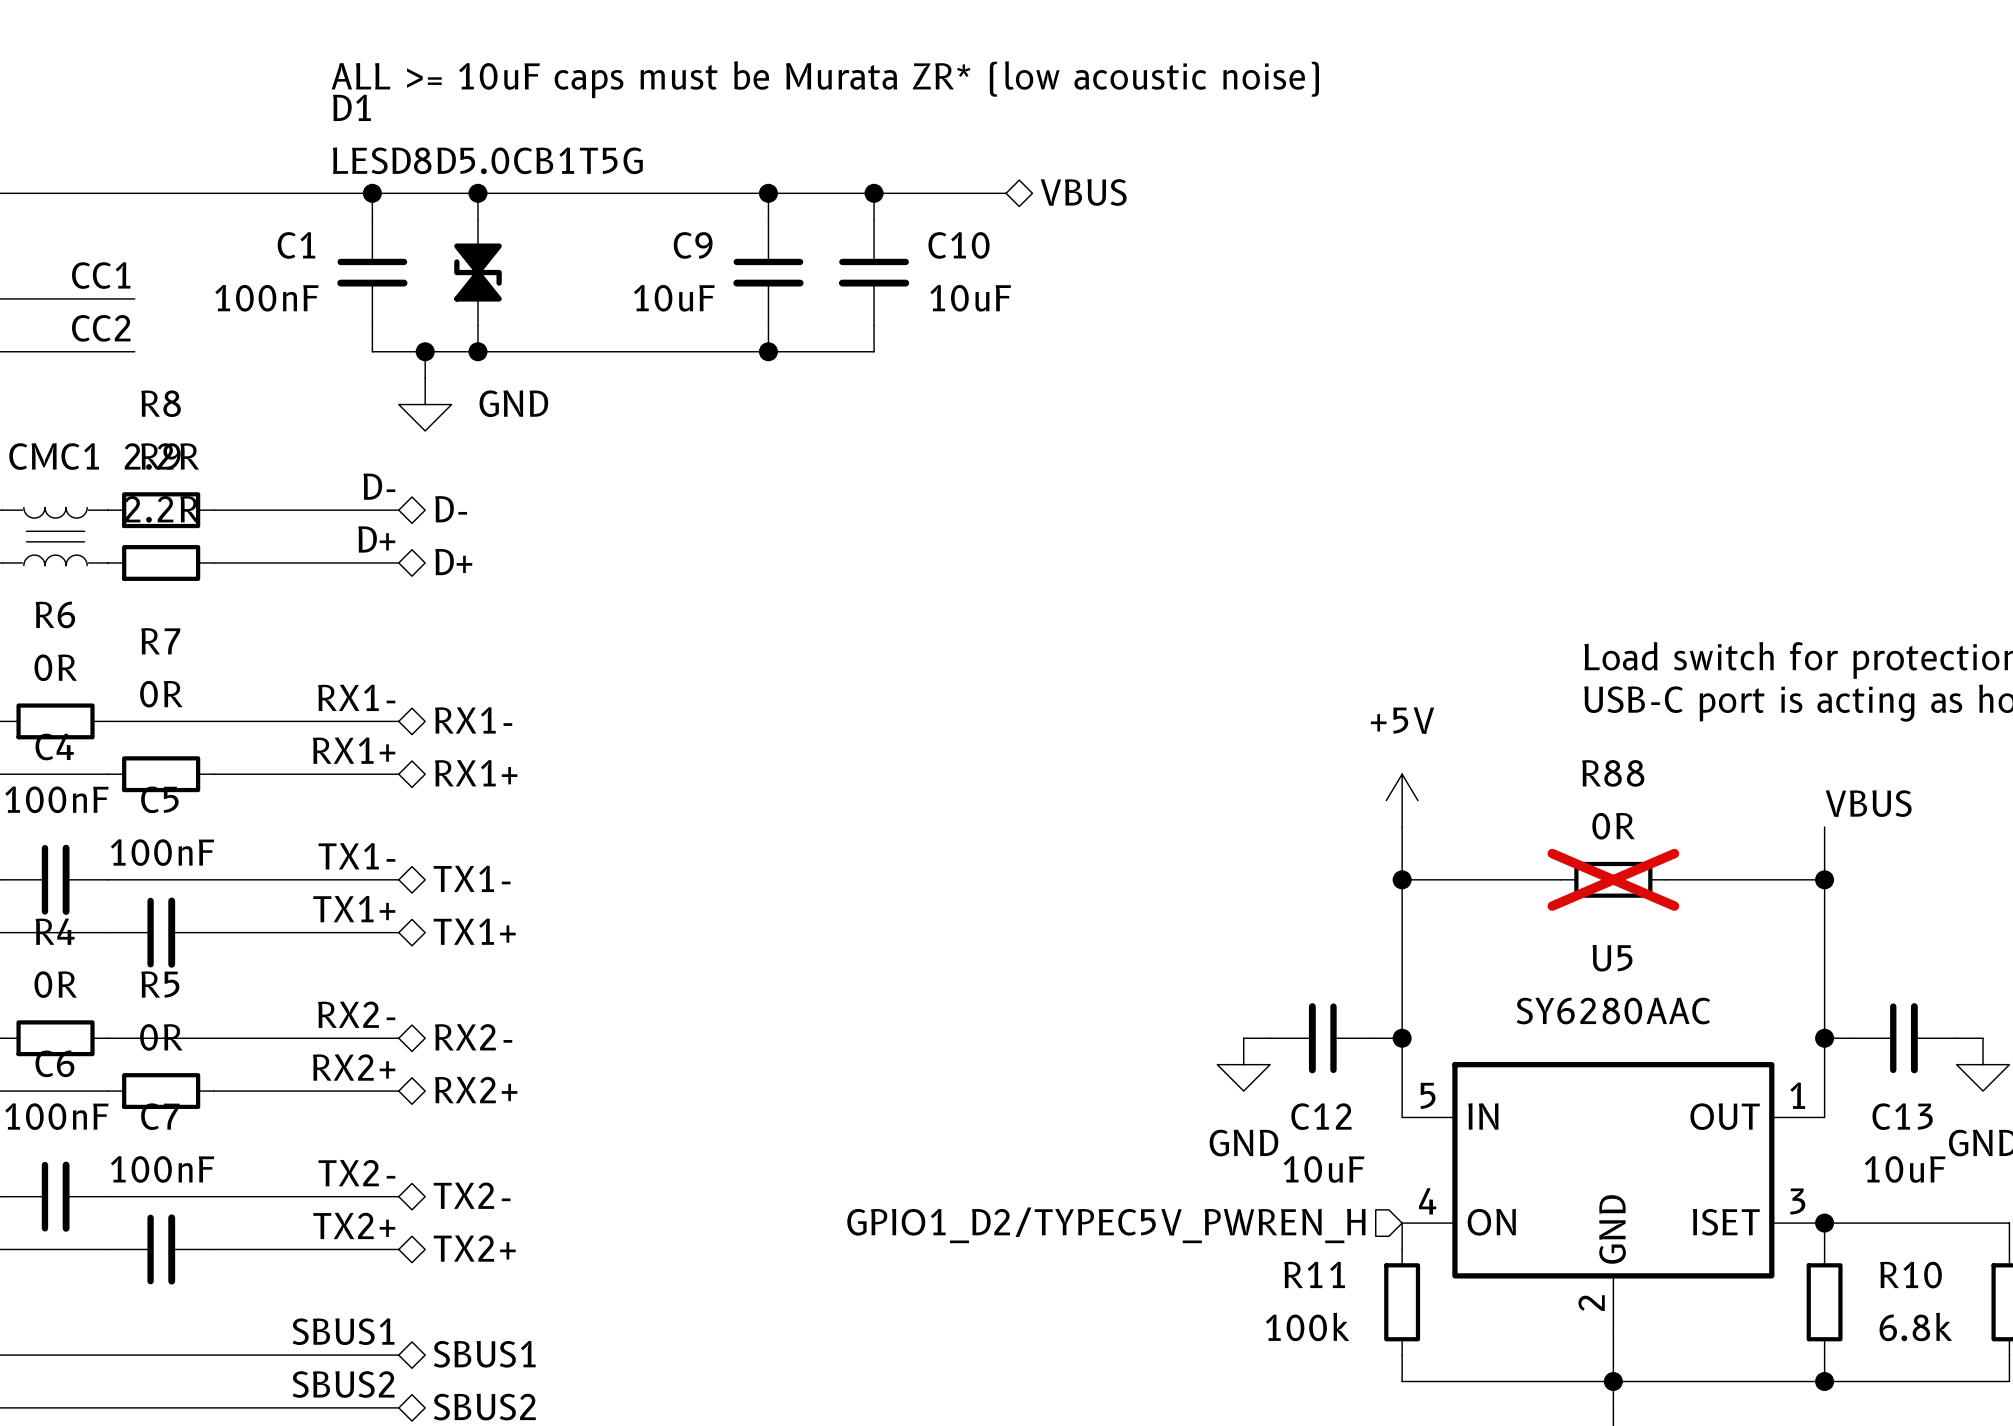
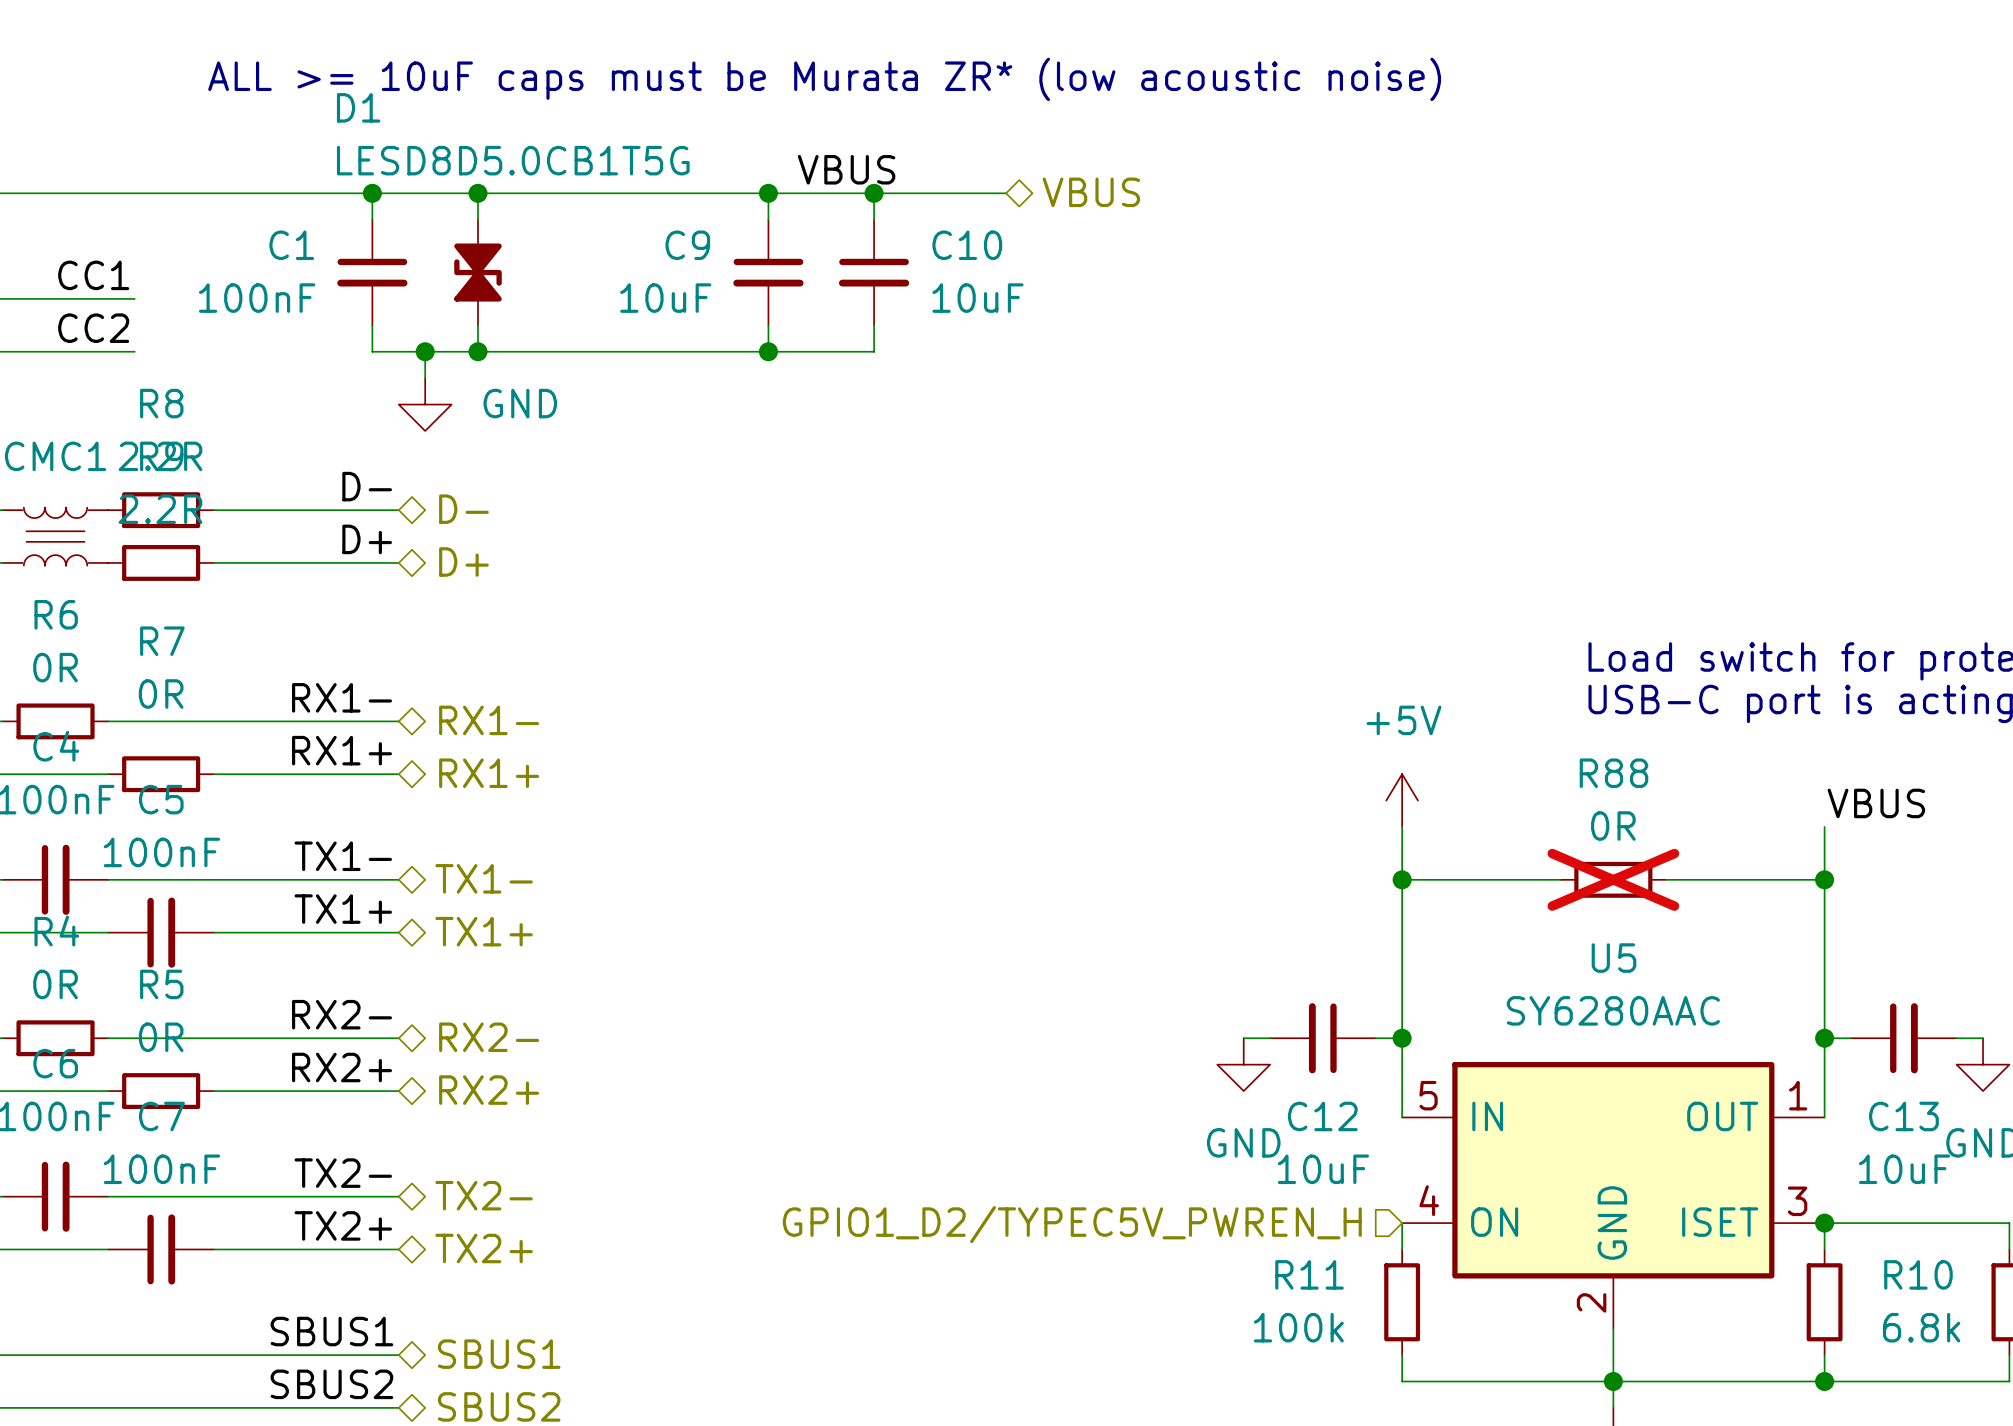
label: none -> VBUS (846, 169)

